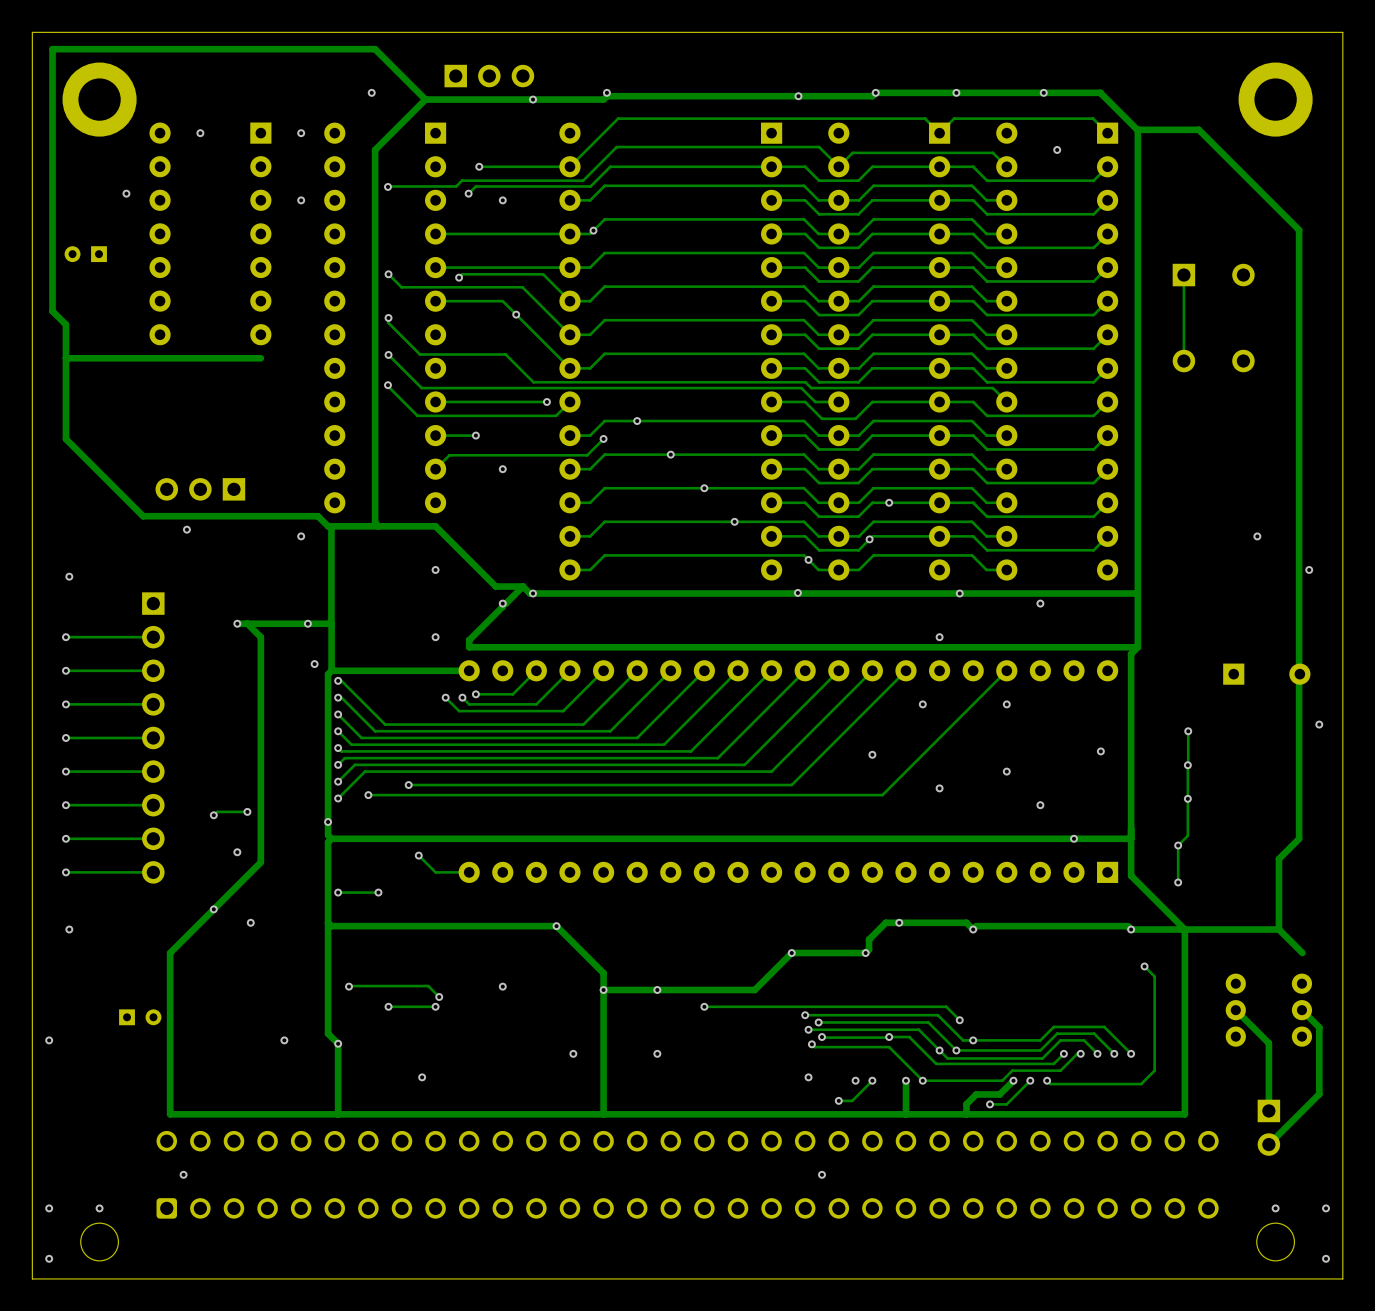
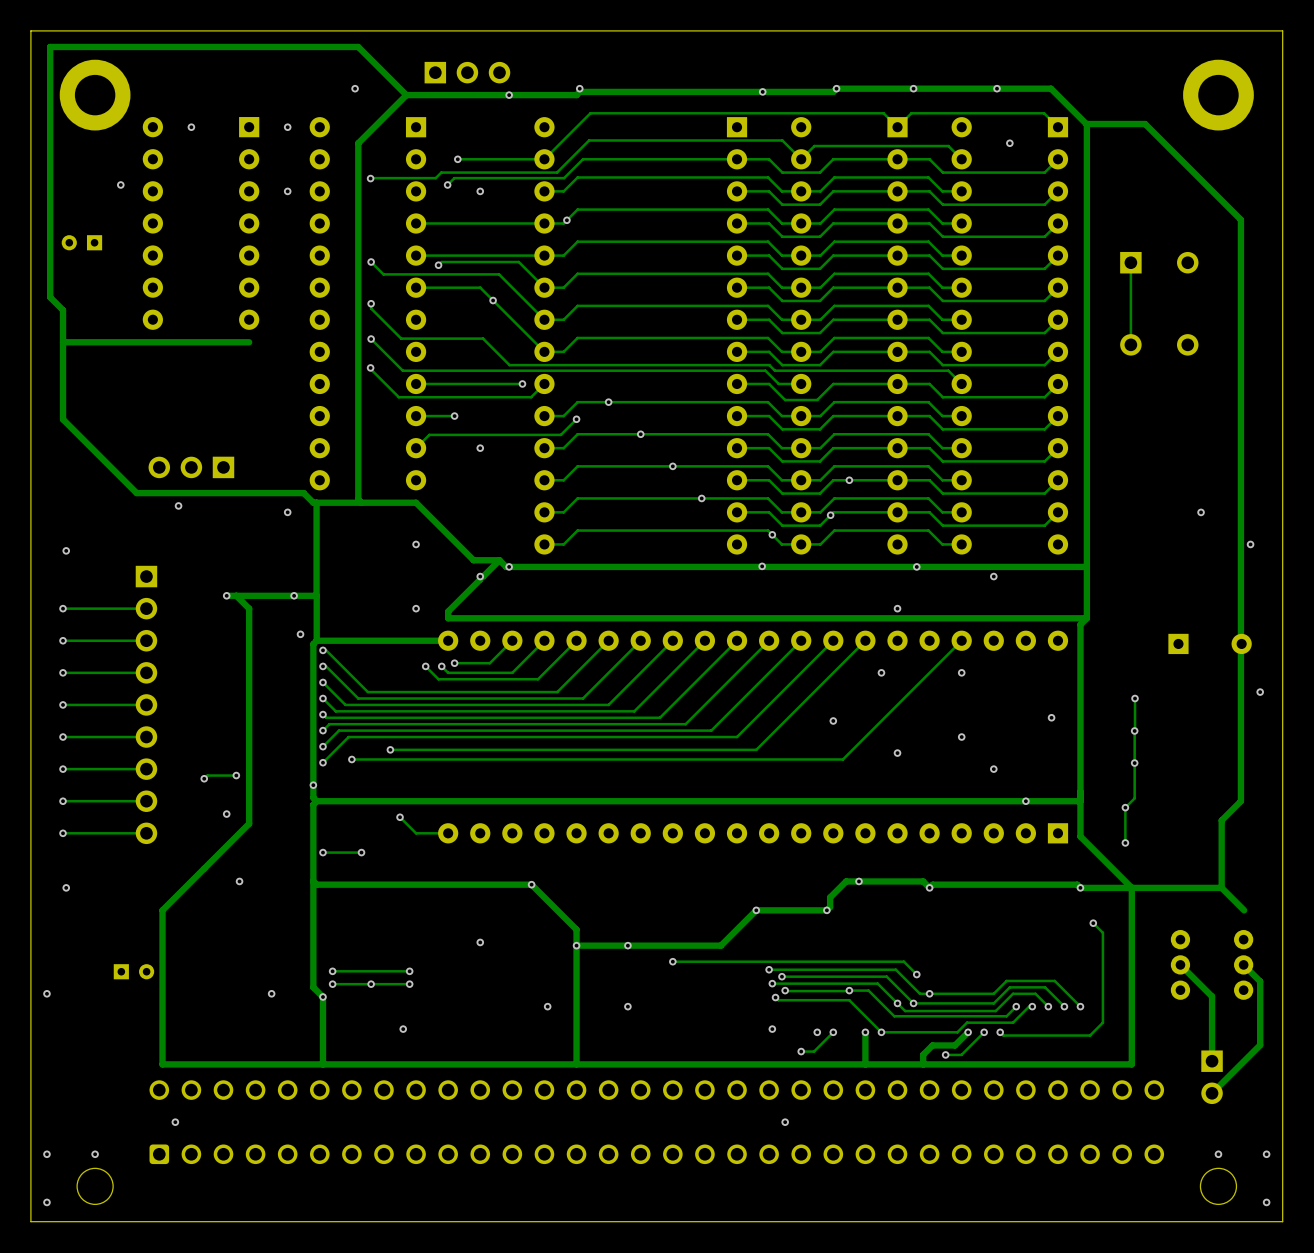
via: (213, 909) -> none
track: (349, 986) (428, 986) (439, 997) -> none
via: (349, 986) -> none
via: (439, 997) -> none
via: (388, 1006) -> none
track: (435, 1006) (388, 1006) -> none
via: (435, 1006) -> none
via: none -> (332, 971)
track: none -> (409, 971) (332, 971)
via: none -> (409, 971)
via: none -> (332, 984)
via: none -> (371, 984)
track: none -> (409, 984) (332, 984)
via: none -> (409, 984)

